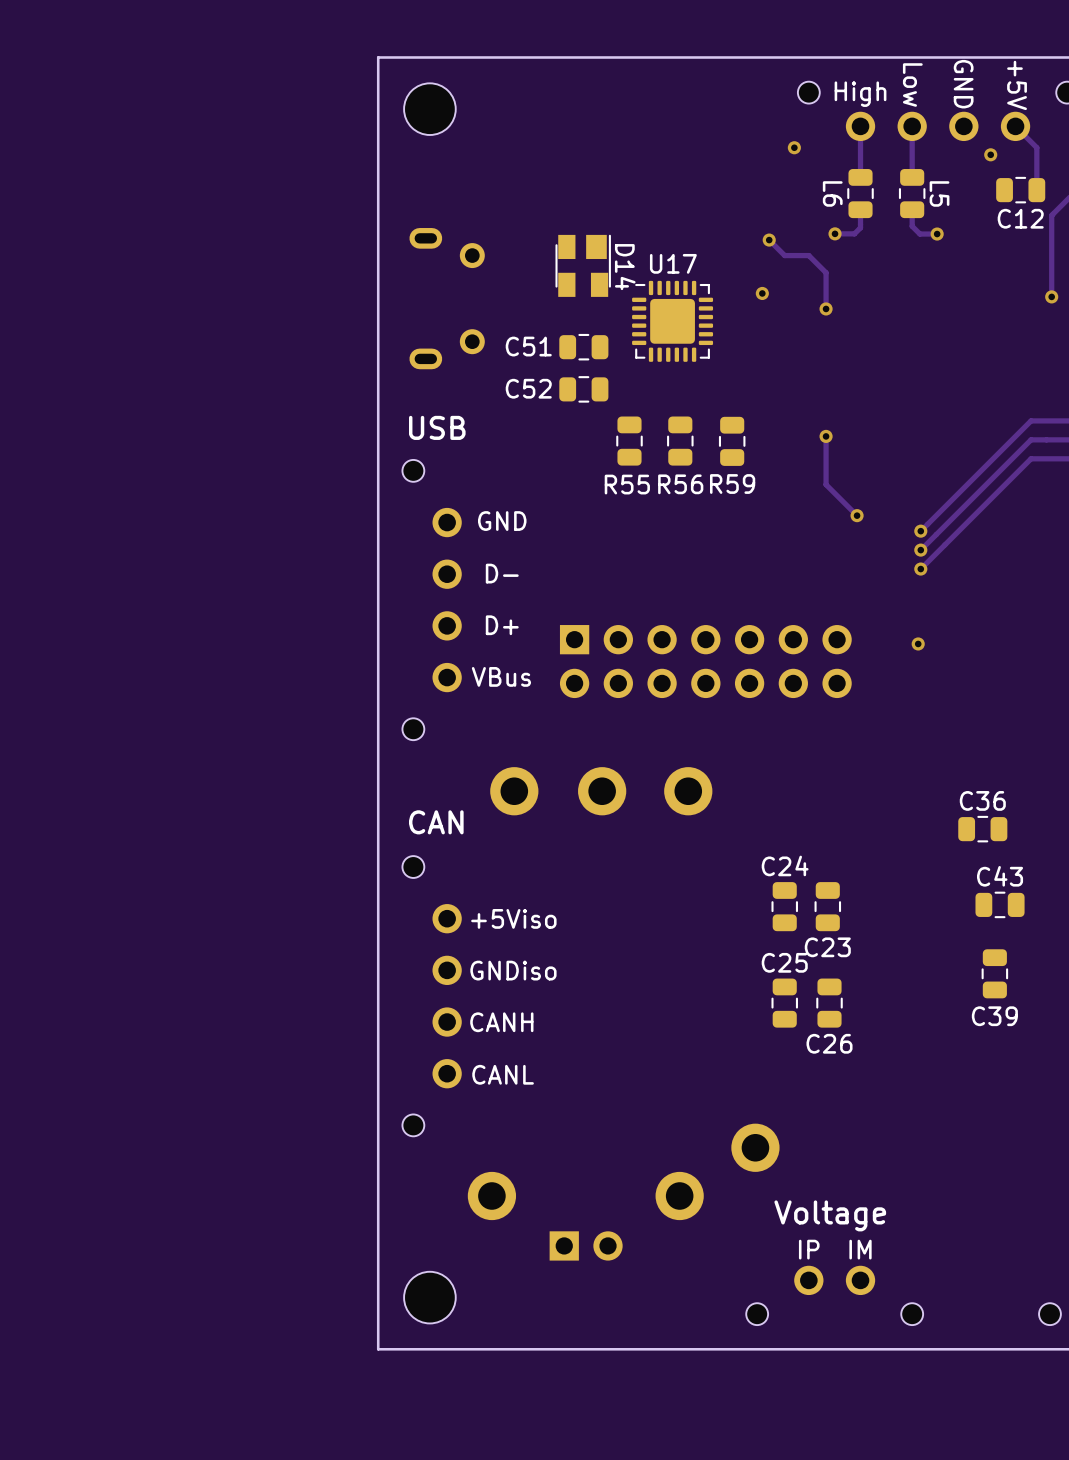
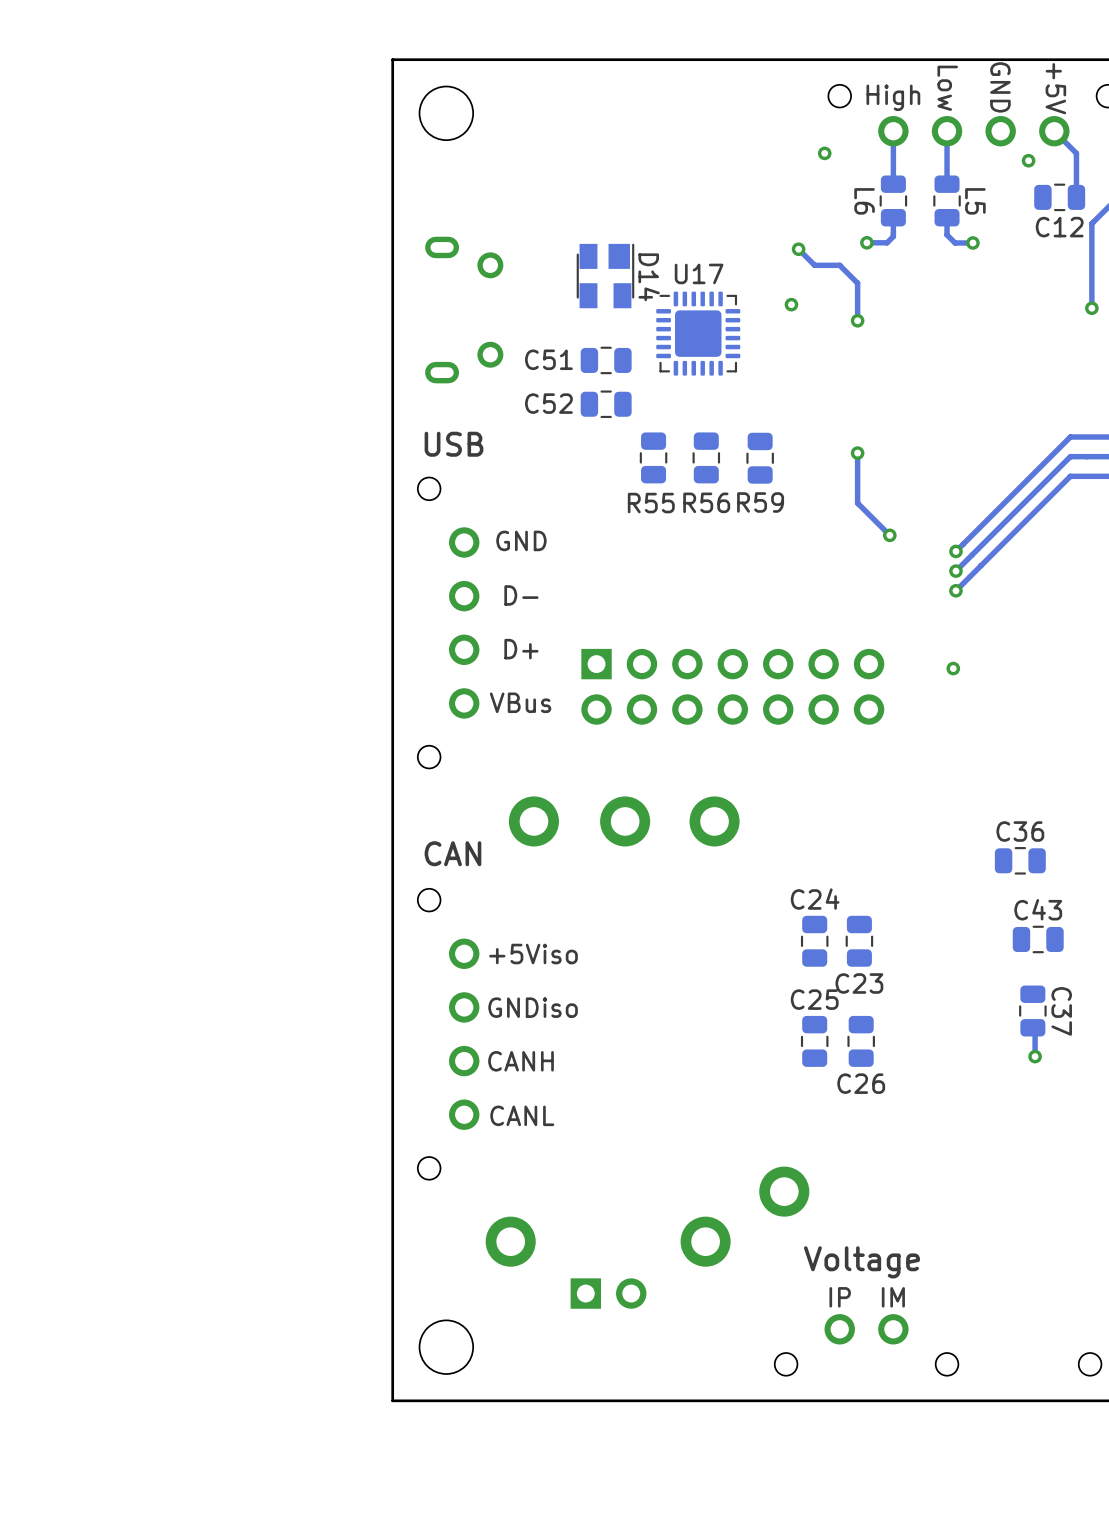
track: none -> (1034, 1027) (1035, 1056)
C39 name: C39 (994, 1016) -> C37 (1061, 1011)
via: none -> (1035, 1056)

